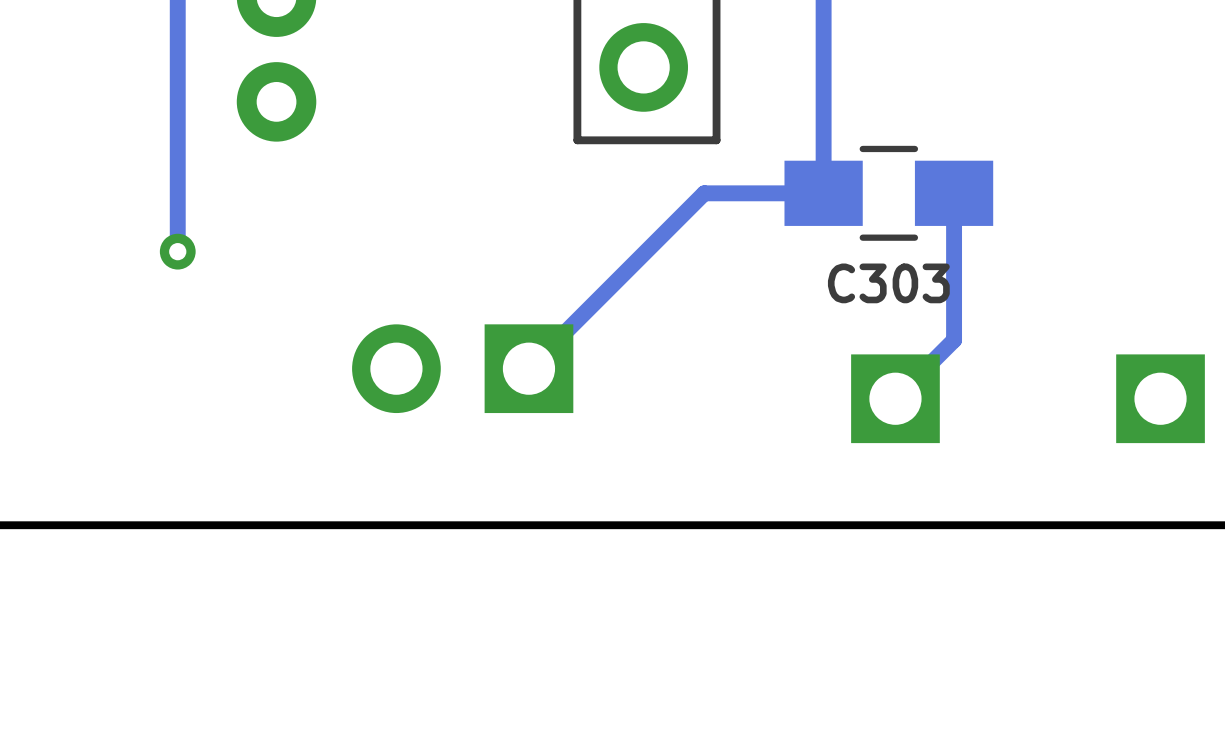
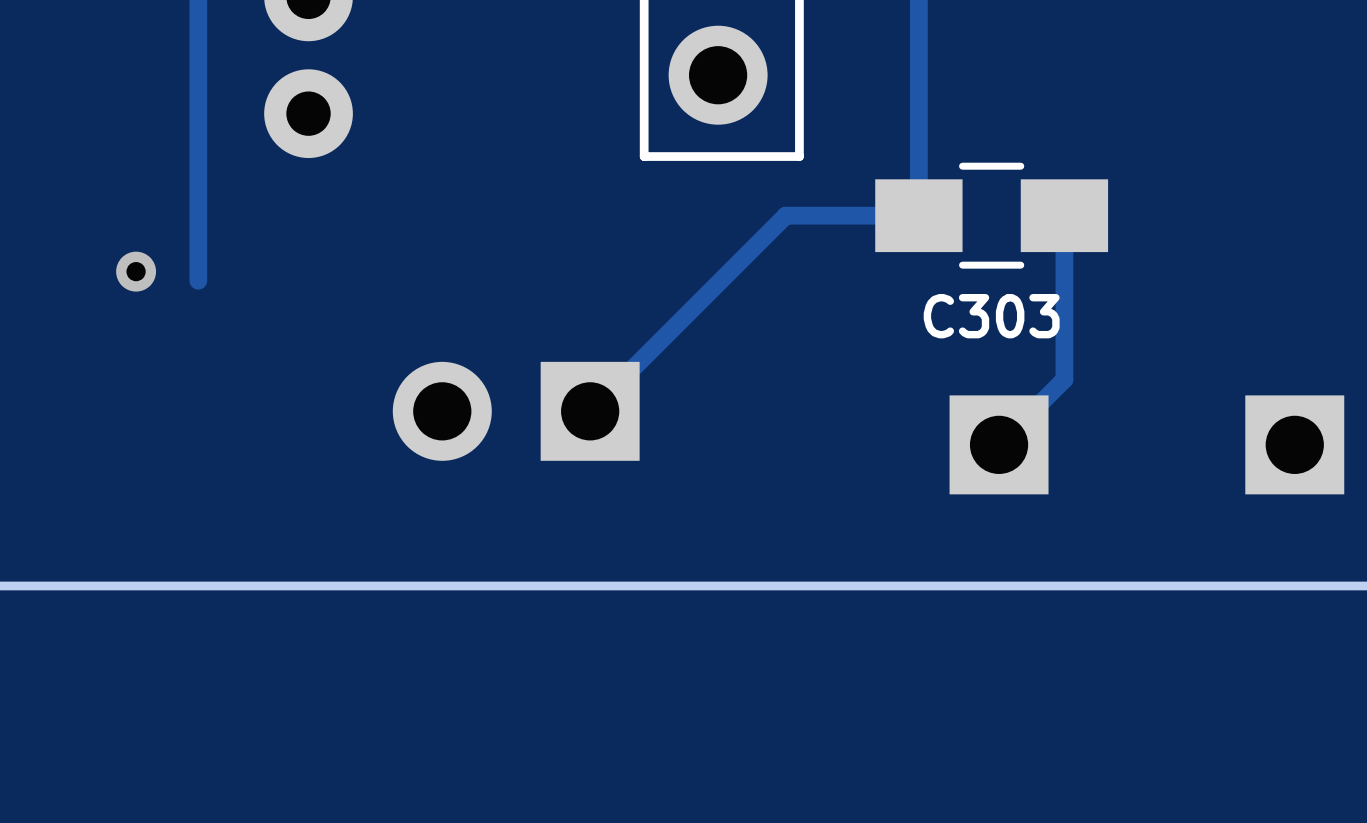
via position: (177, 251) -> (136, 271)

